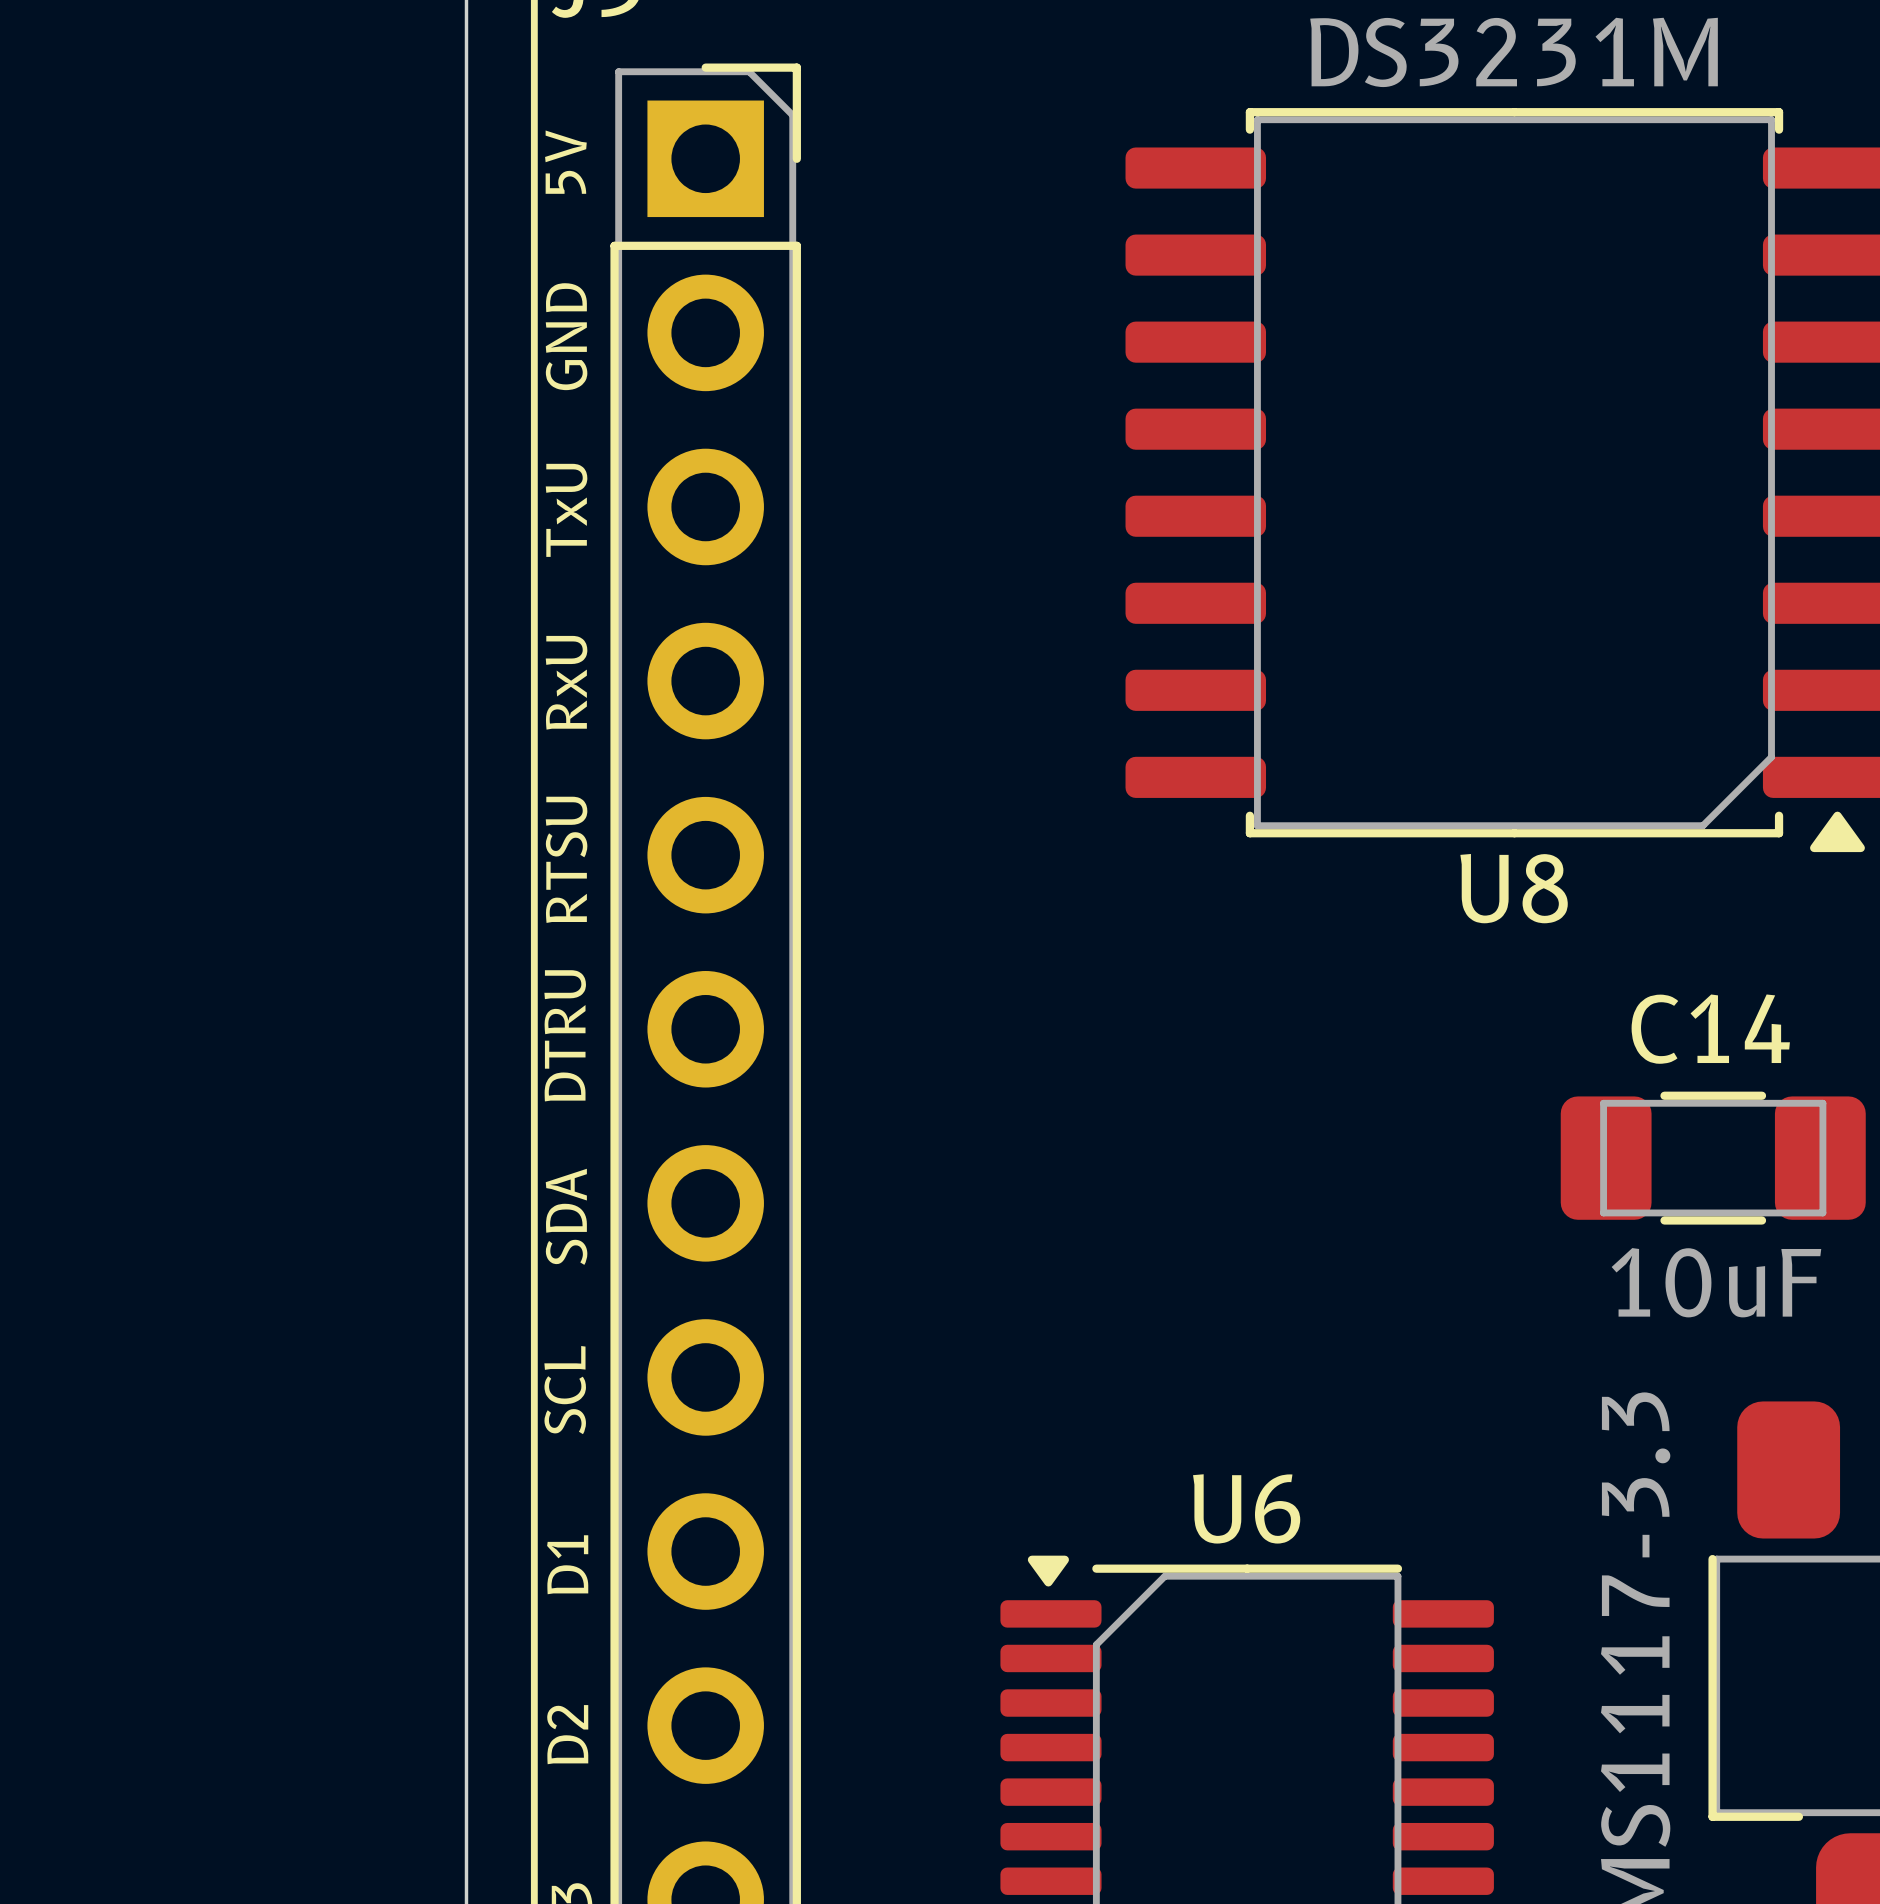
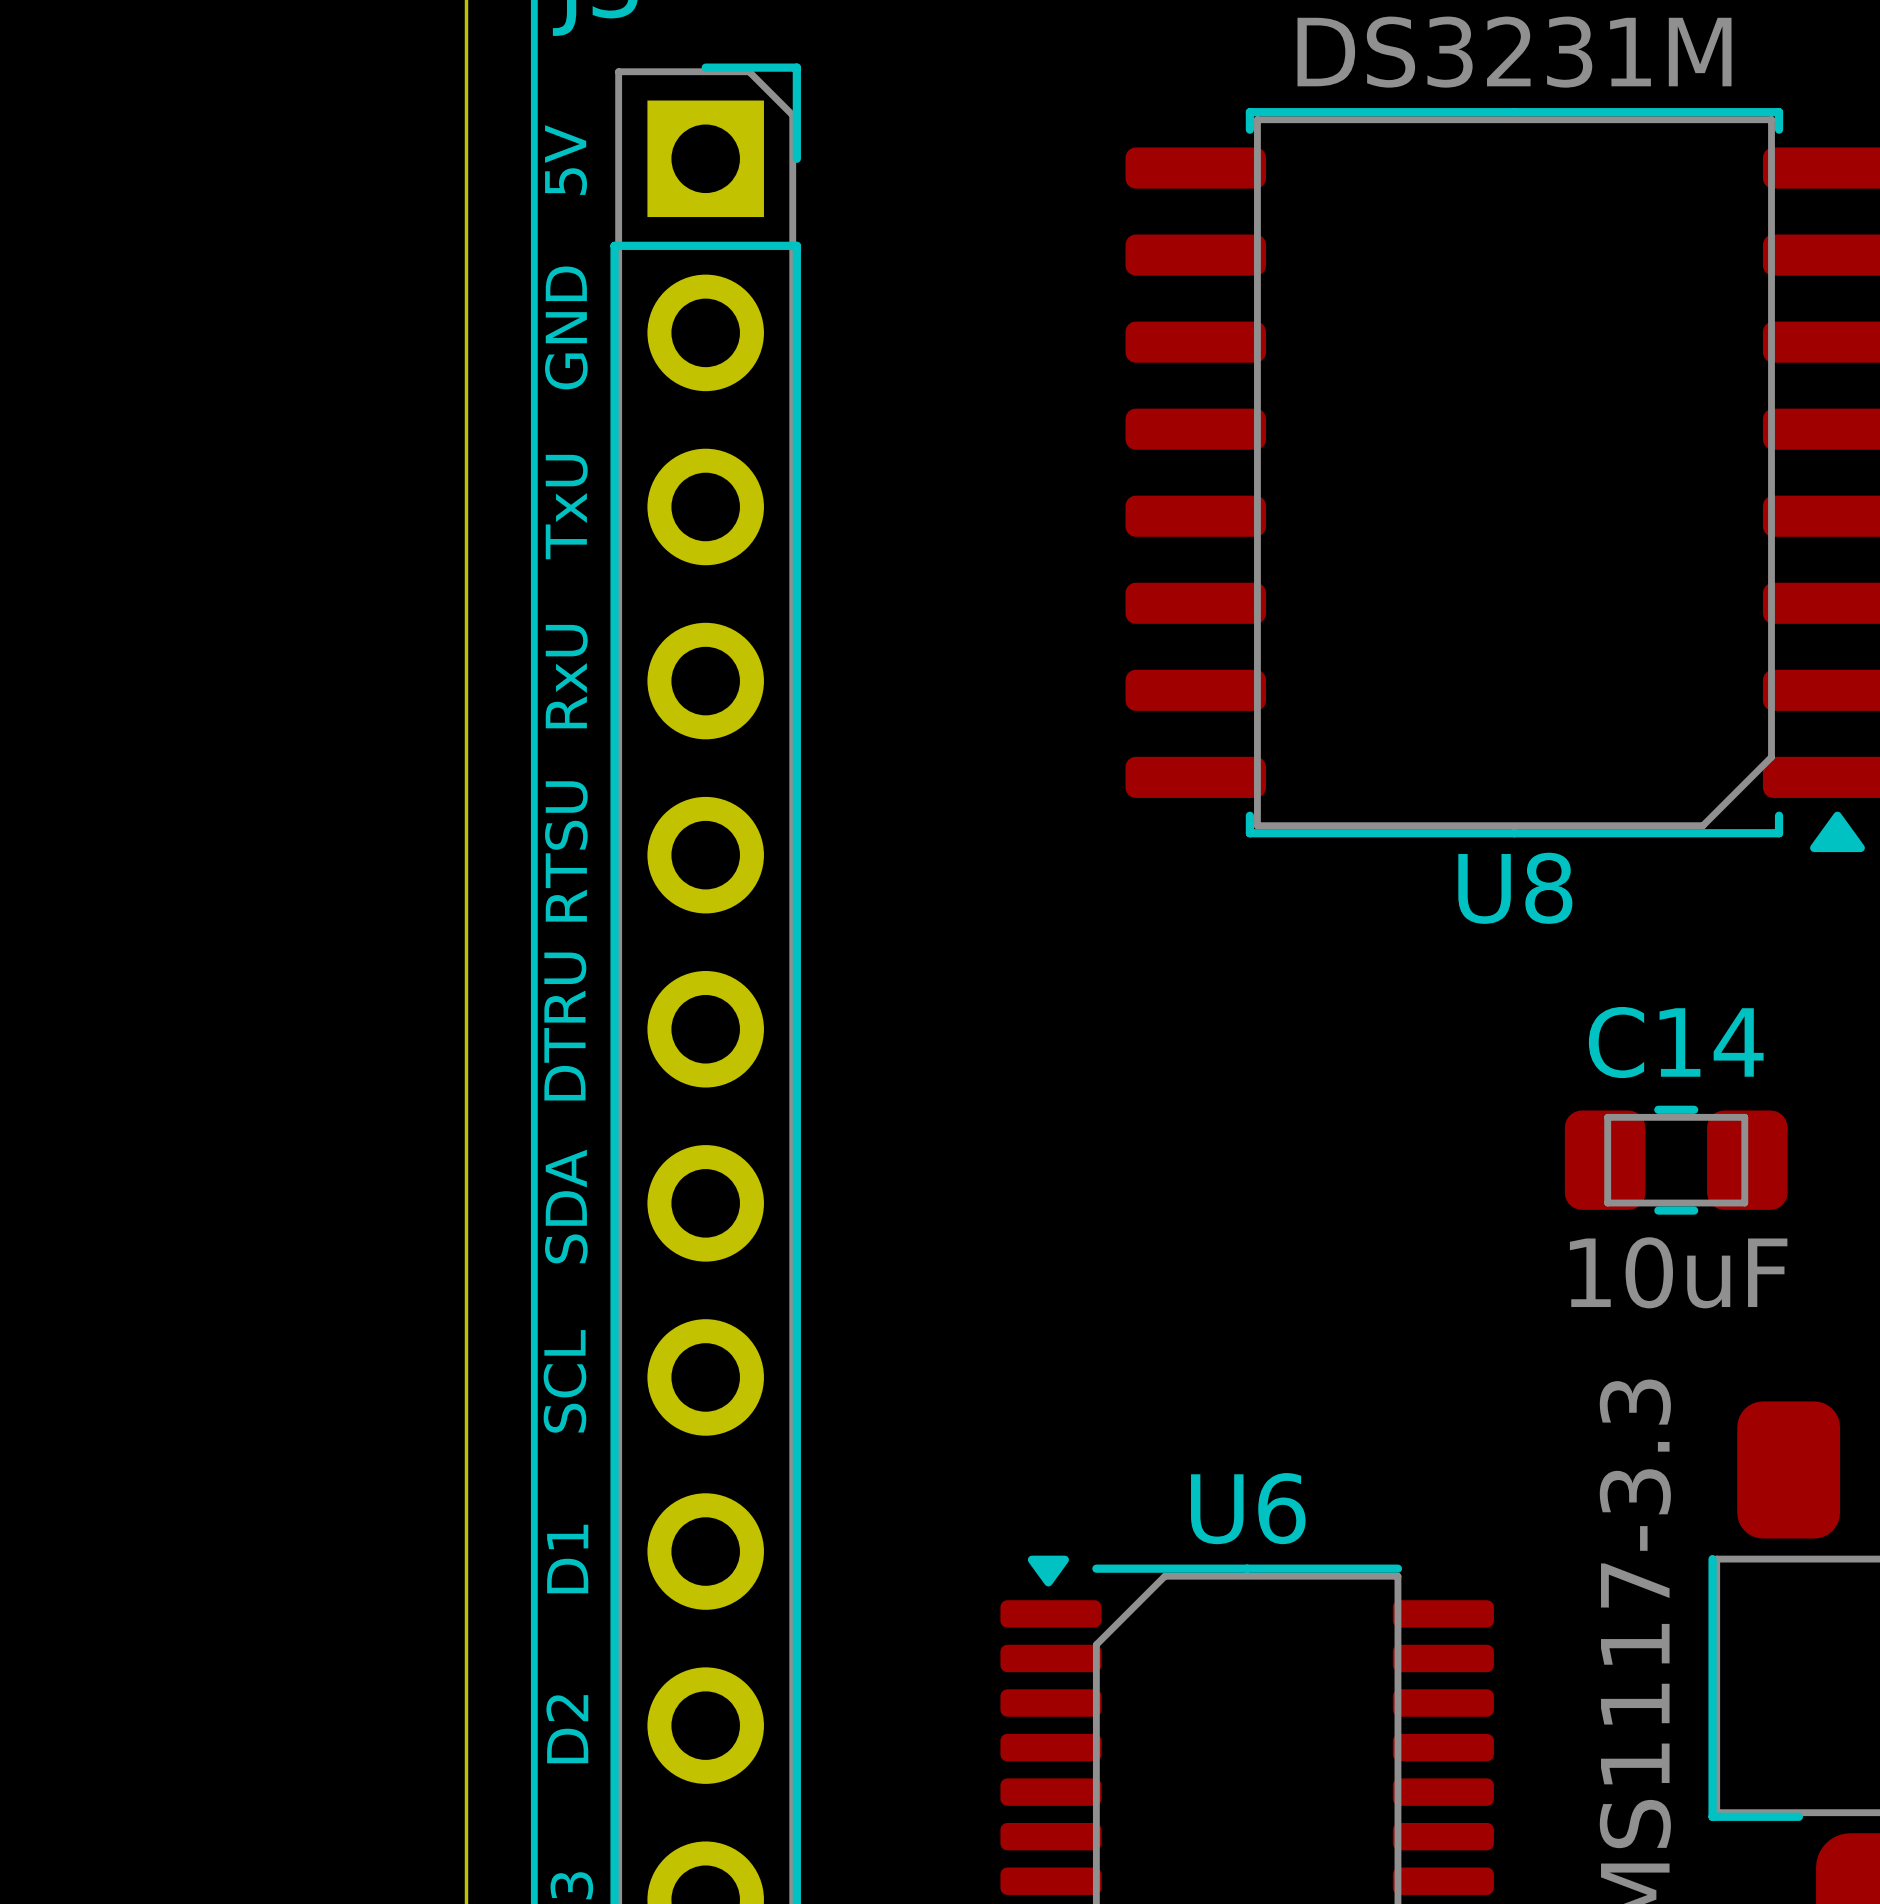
C14 footprint: [1560, 1091, 1866, 1225] -> [1564, 1105, 1788, 1215]

